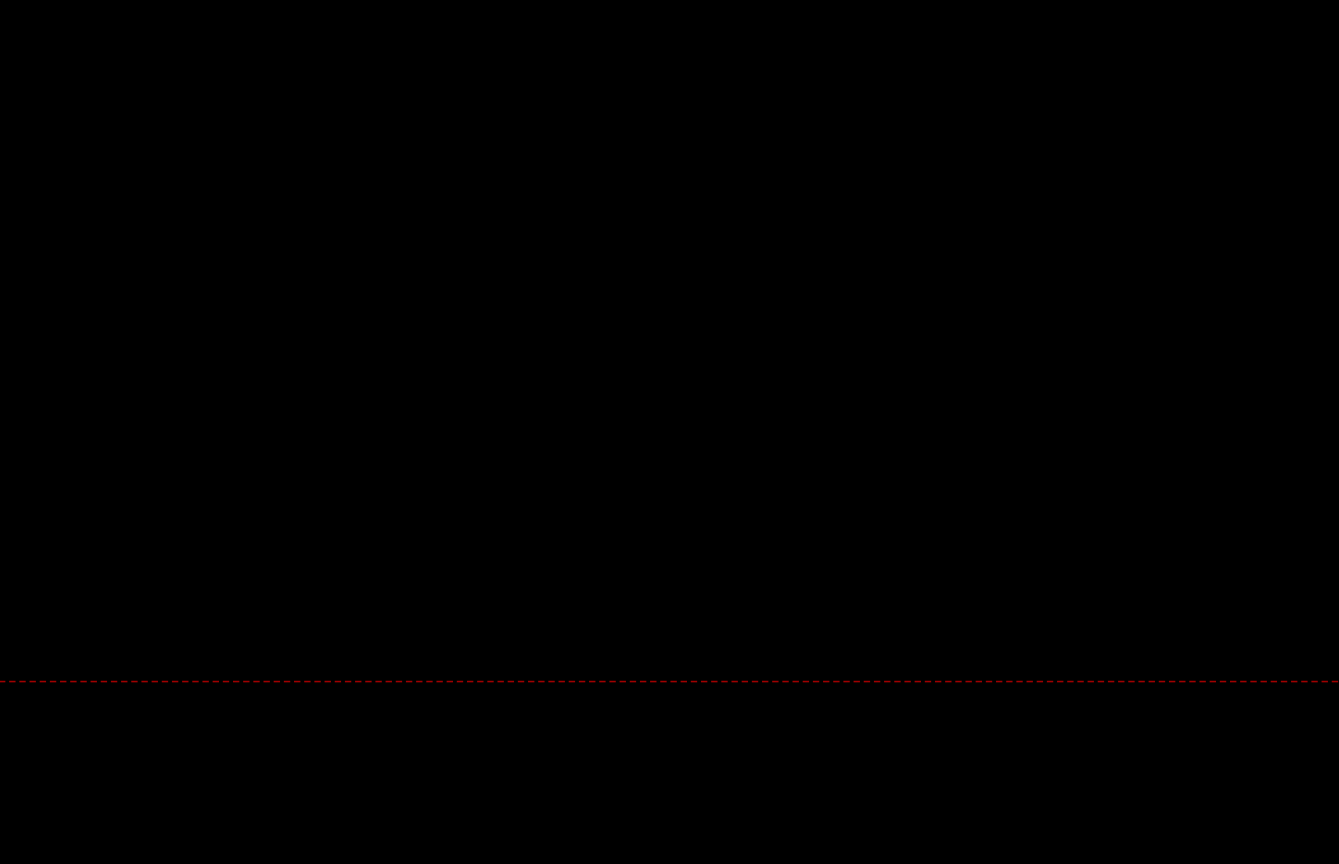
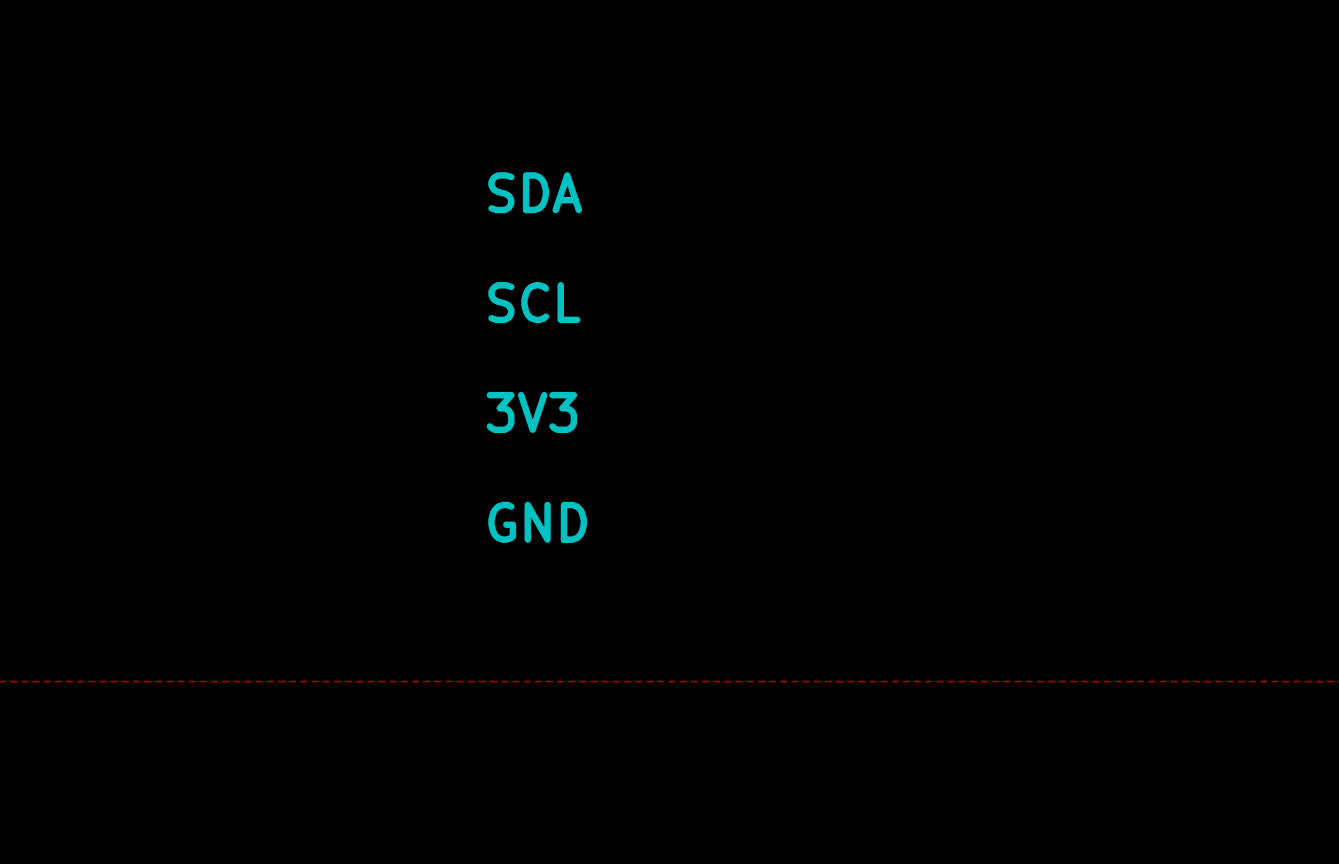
text: none -> SDA (535, 192)
text: none -> SCL (534, 302)
text: none -> 3V3 (531, 412)
text: none -> GND (537, 522)

